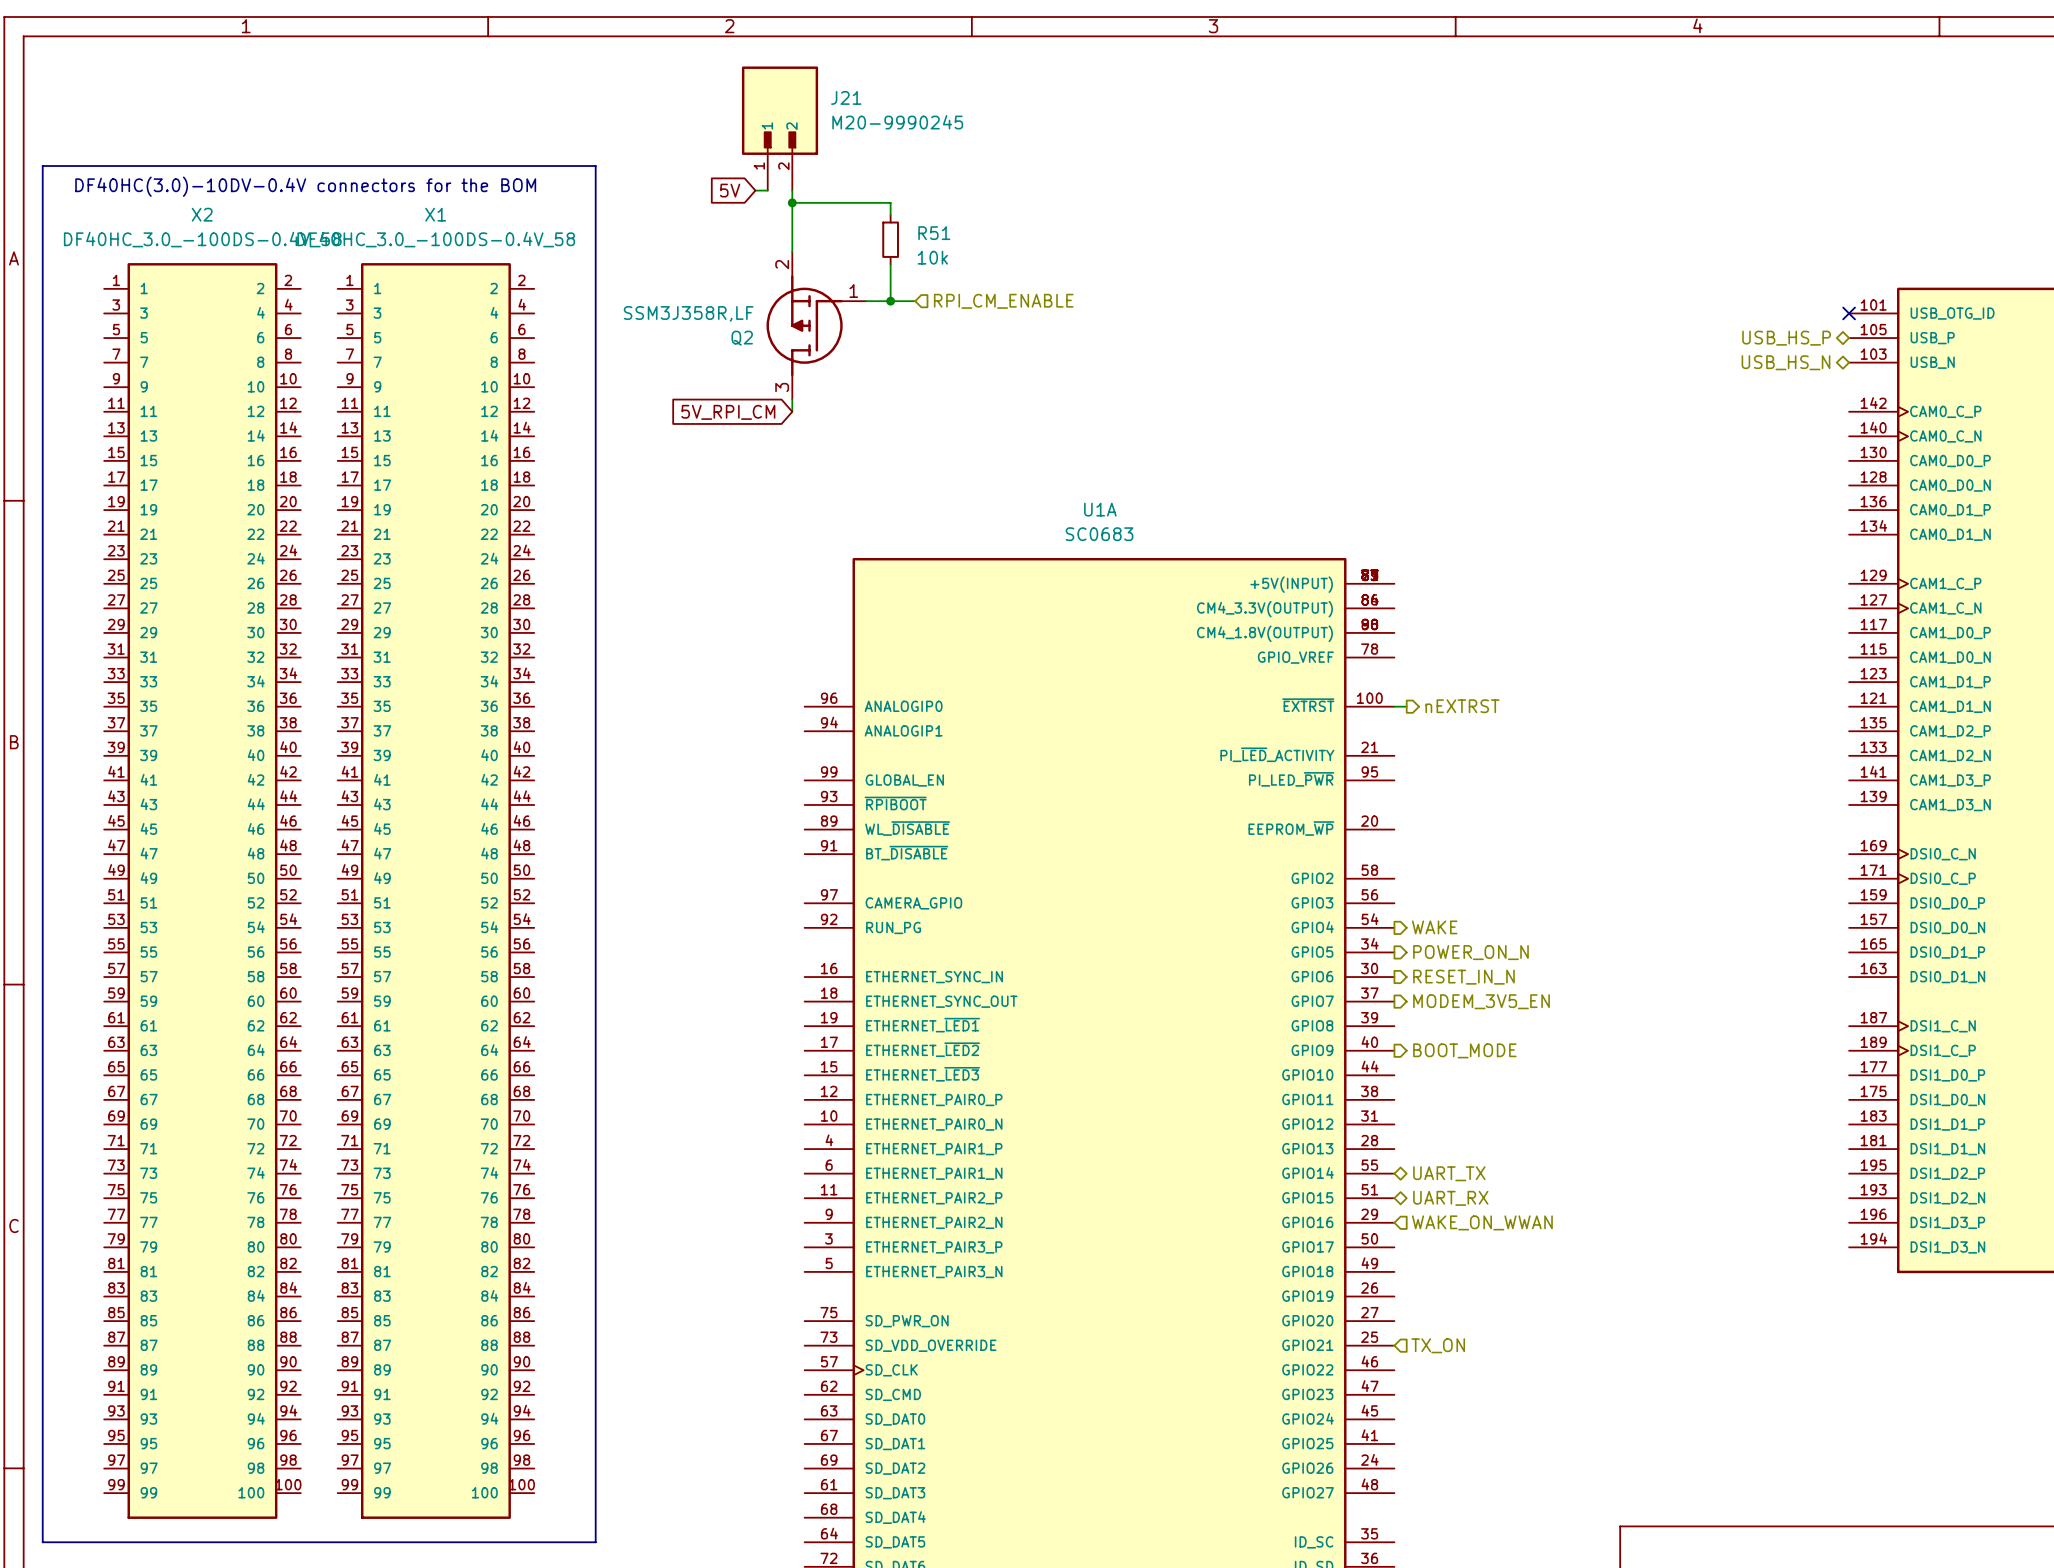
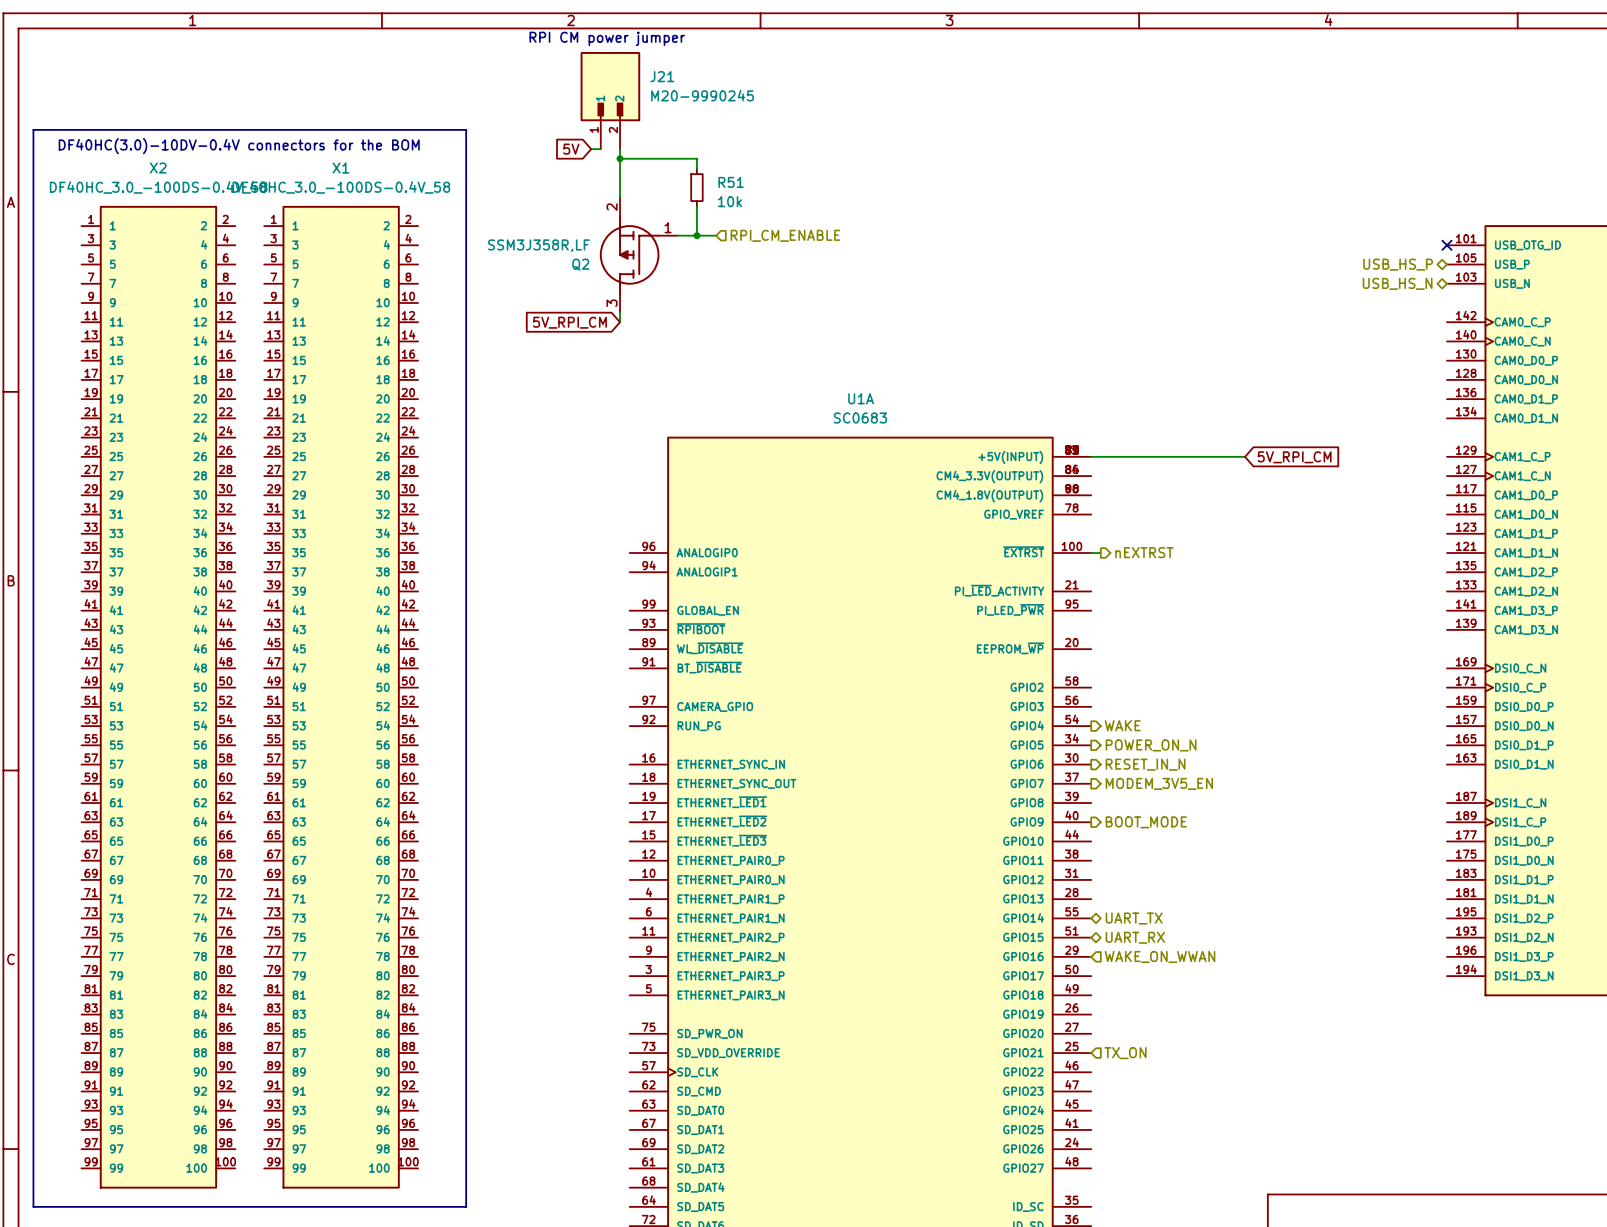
text: none -> RPI CM power jumper (607, 38)
wire: none -> (1091, 456) (1245, 456)
global label: none -> 5V_RPI_CM (1294, 457)

